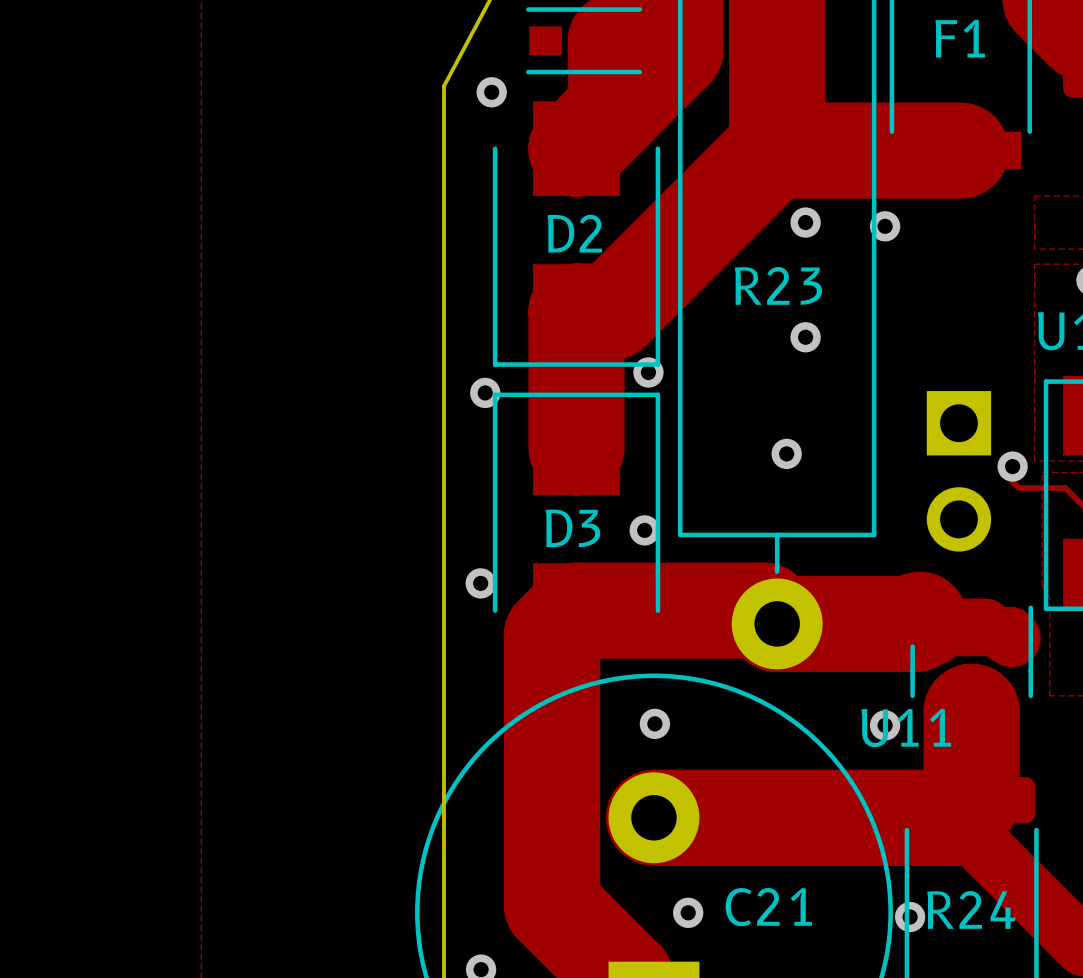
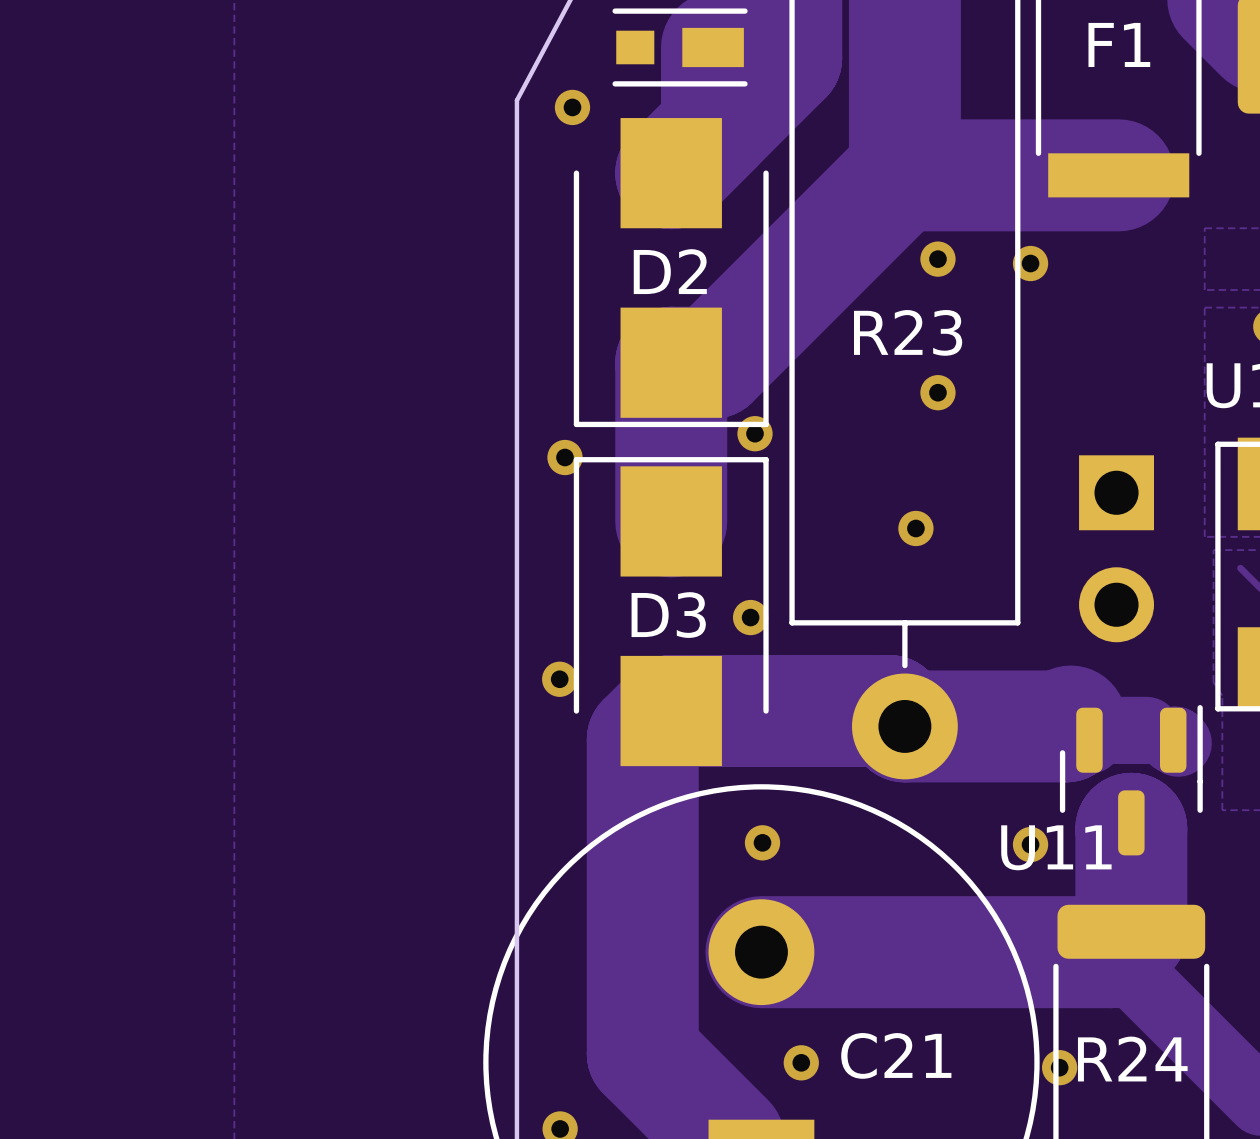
track: (1012, 466) (1012, 481) (1019, 487) (1065, 487) -> none
via: (1012, 466) -> none

